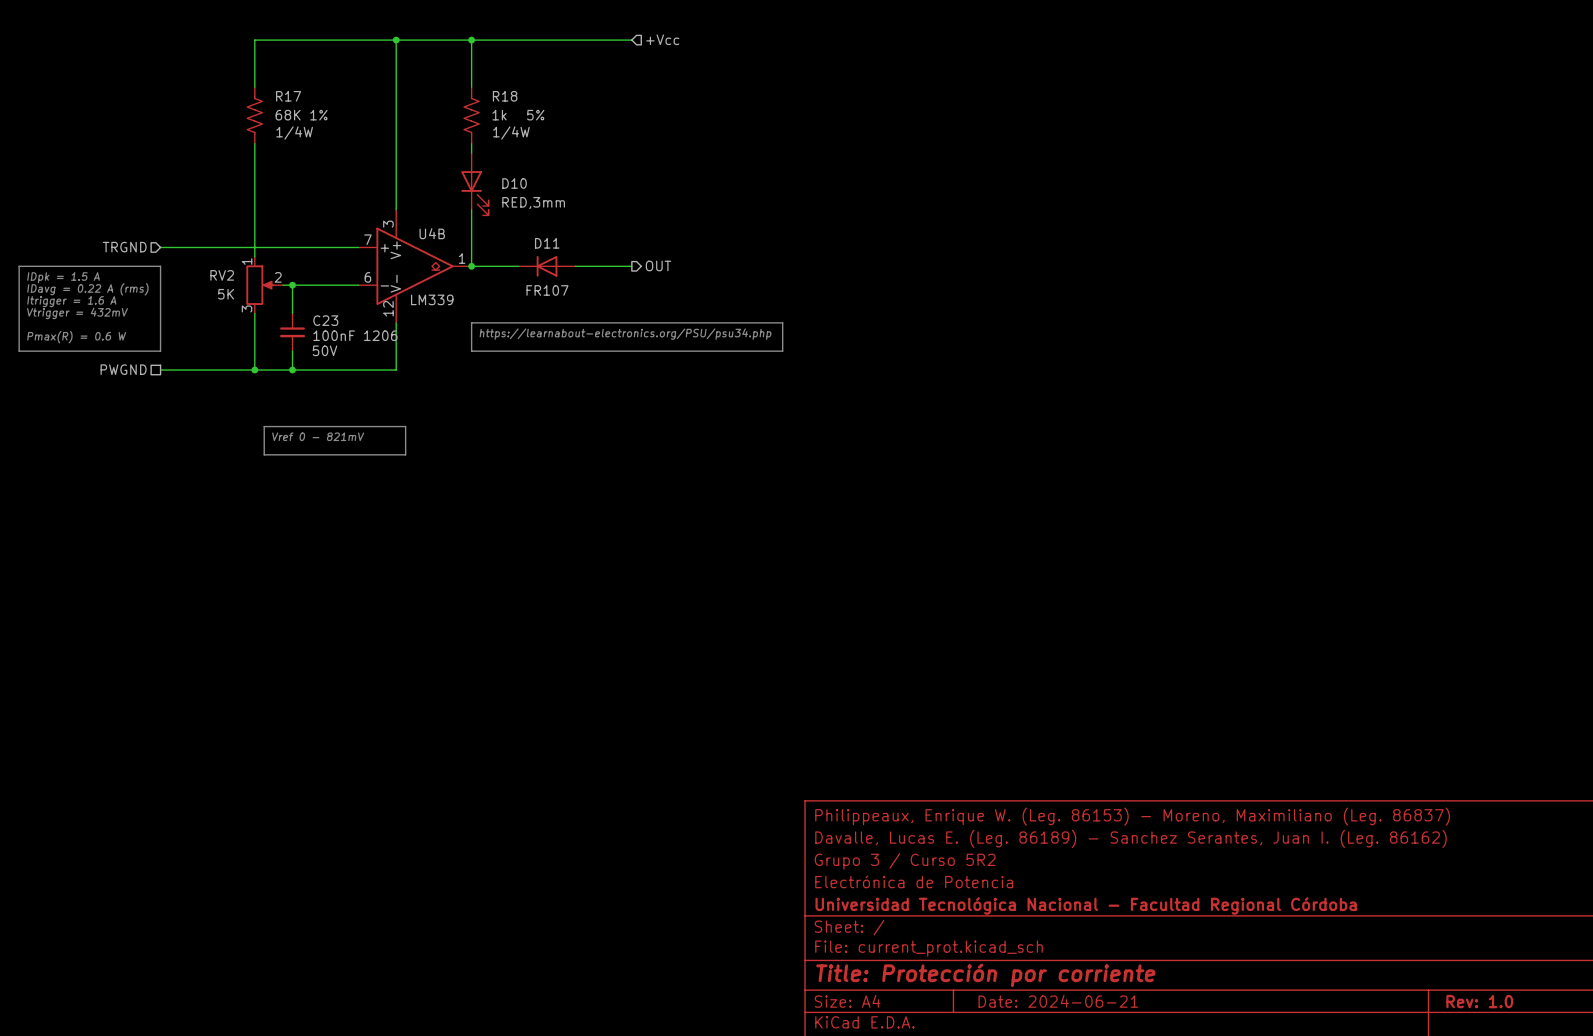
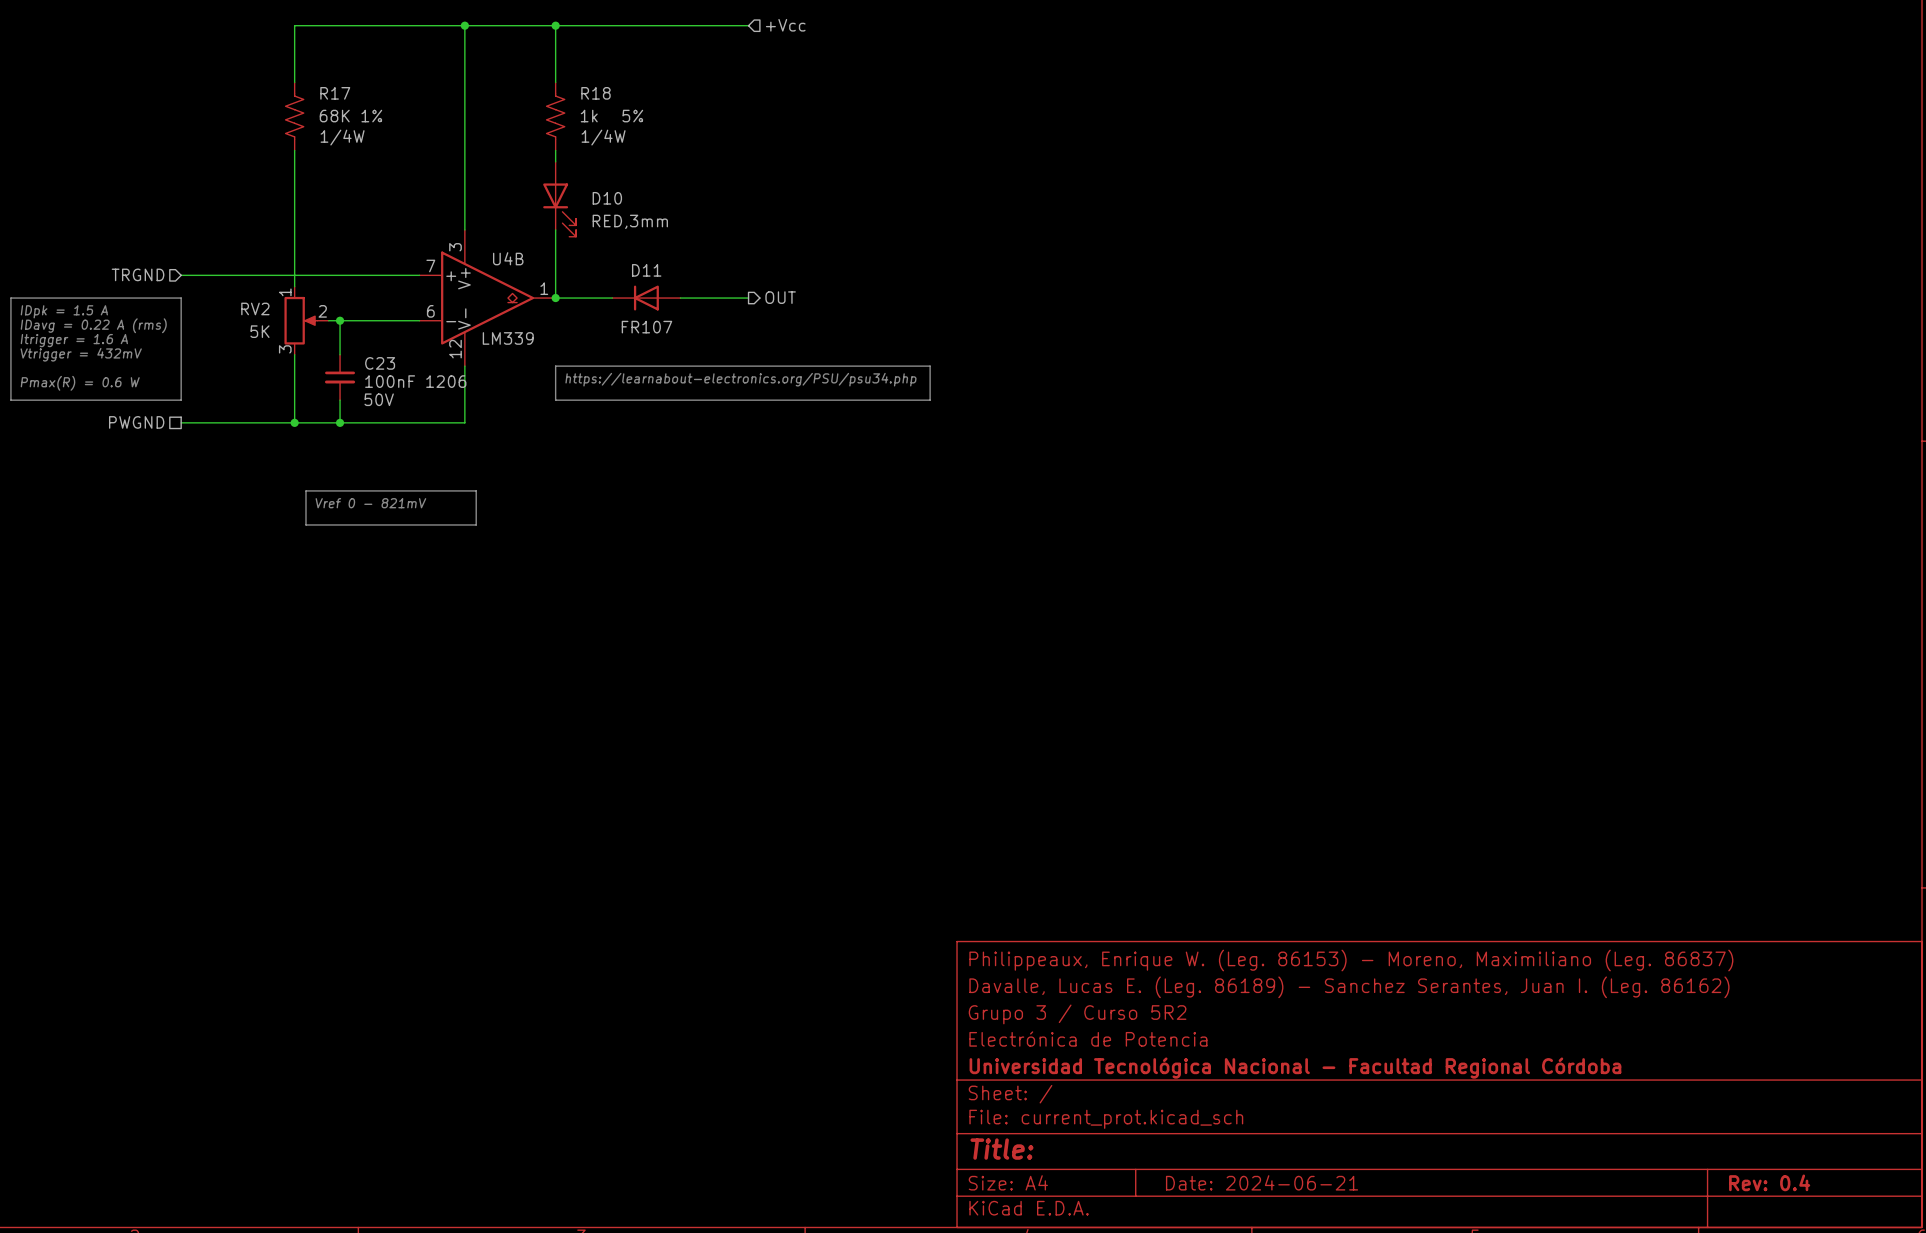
title block: Title: Protección por corriente (985, 975) -> Title: (1001, 1149)
title block: Rev: 1.0 (1479, 1001) -> Rev: 0.4 (1769, 1182)

